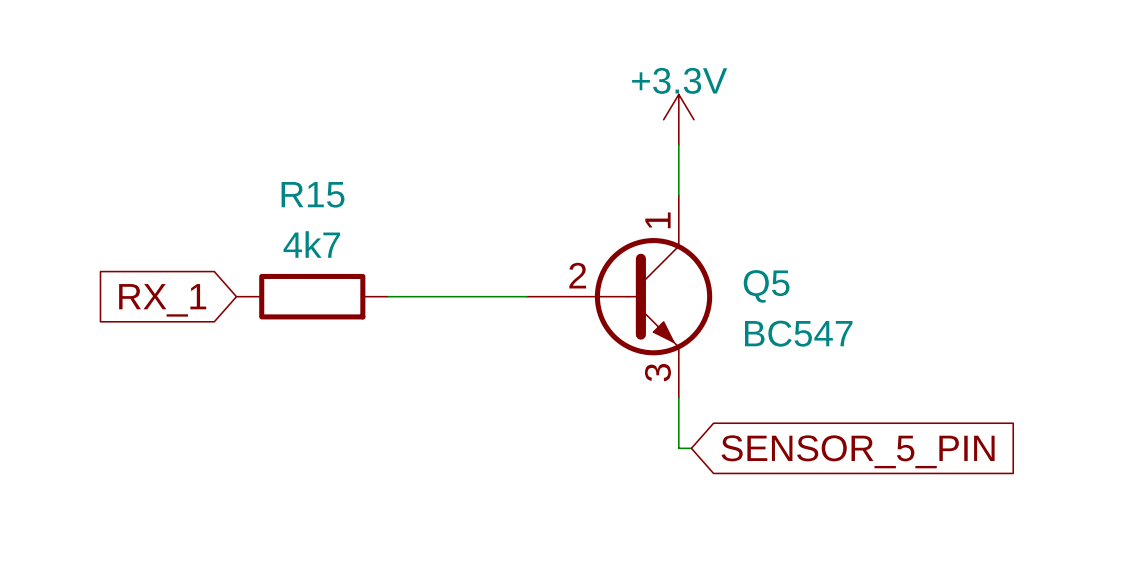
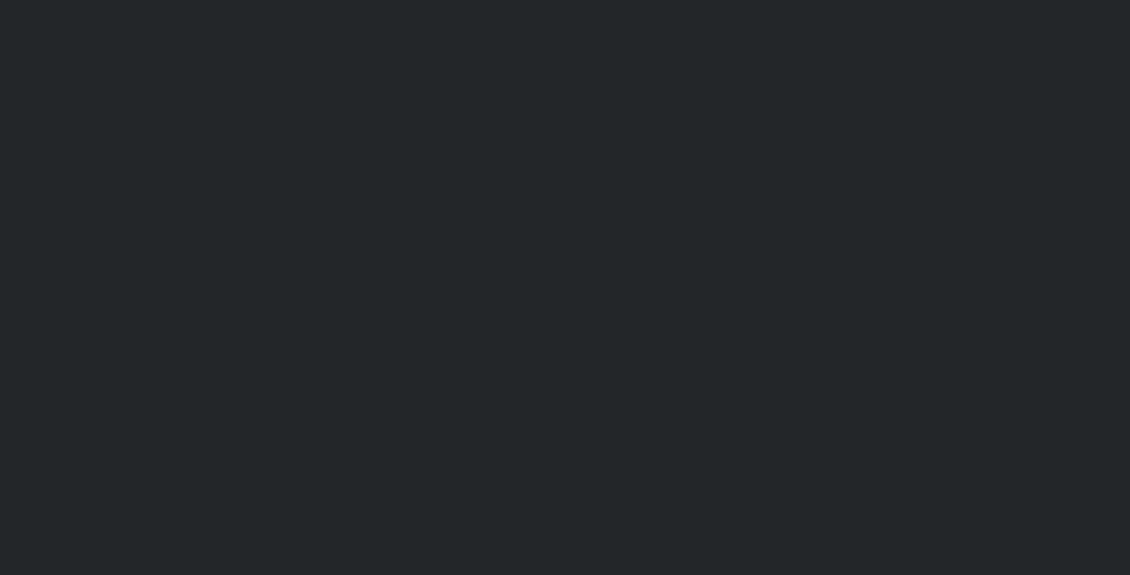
power symbol: +3.3V (678, 119) -> none
wire: (678, 145) (678, 195) -> none
R15: 4k7 (312, 296) -> none
wire: (388, 296) (527, 296) -> none
Q5: BC547 (619, 296) -> none
global label: RX_1 (162, 300) -> none
wire: (678, 397) (678, 448) (691, 448) -> none
global label: SENSOR_5_PIN (858, 451) -> none

